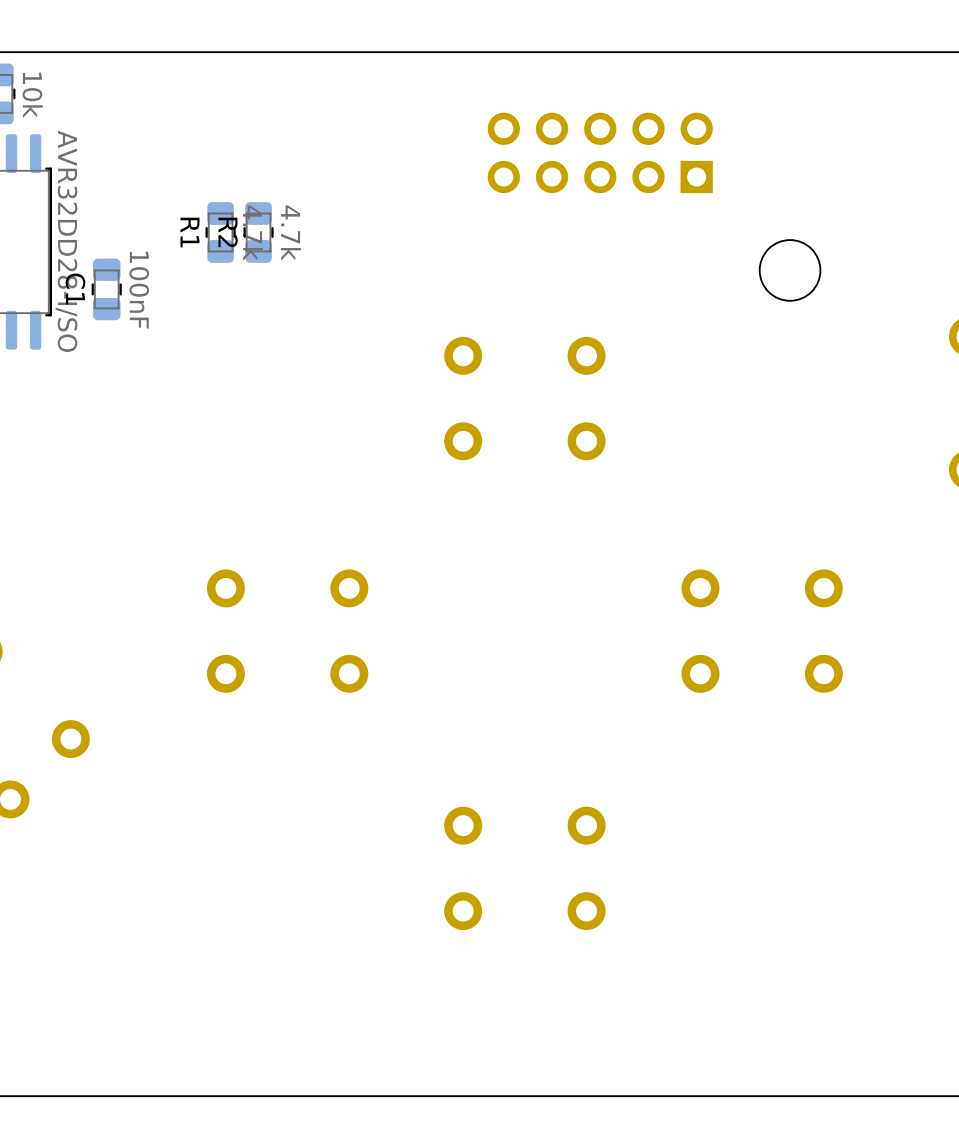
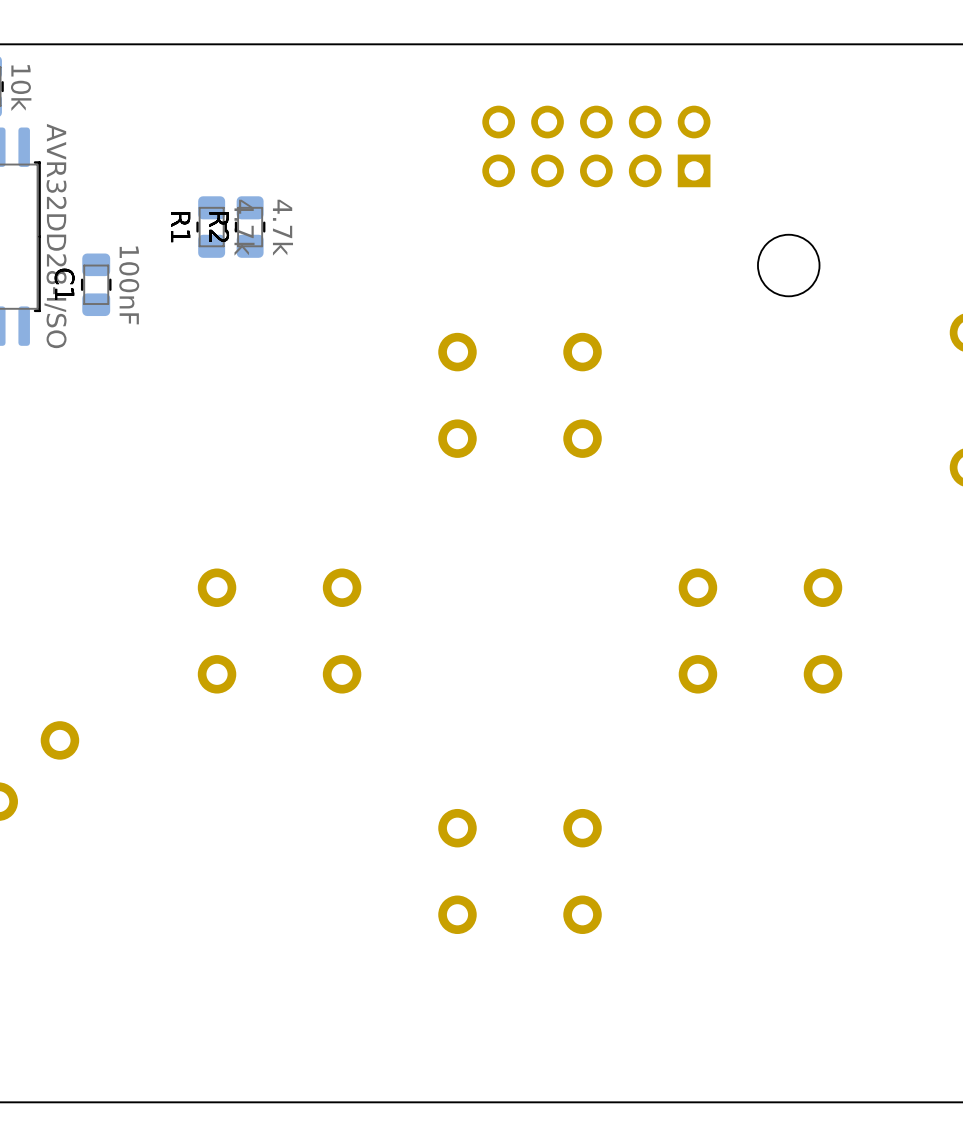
text: none -> R1 (180, 227)
text: none -> R2 (219, 227)
text: none -> C1 (64, 284)

